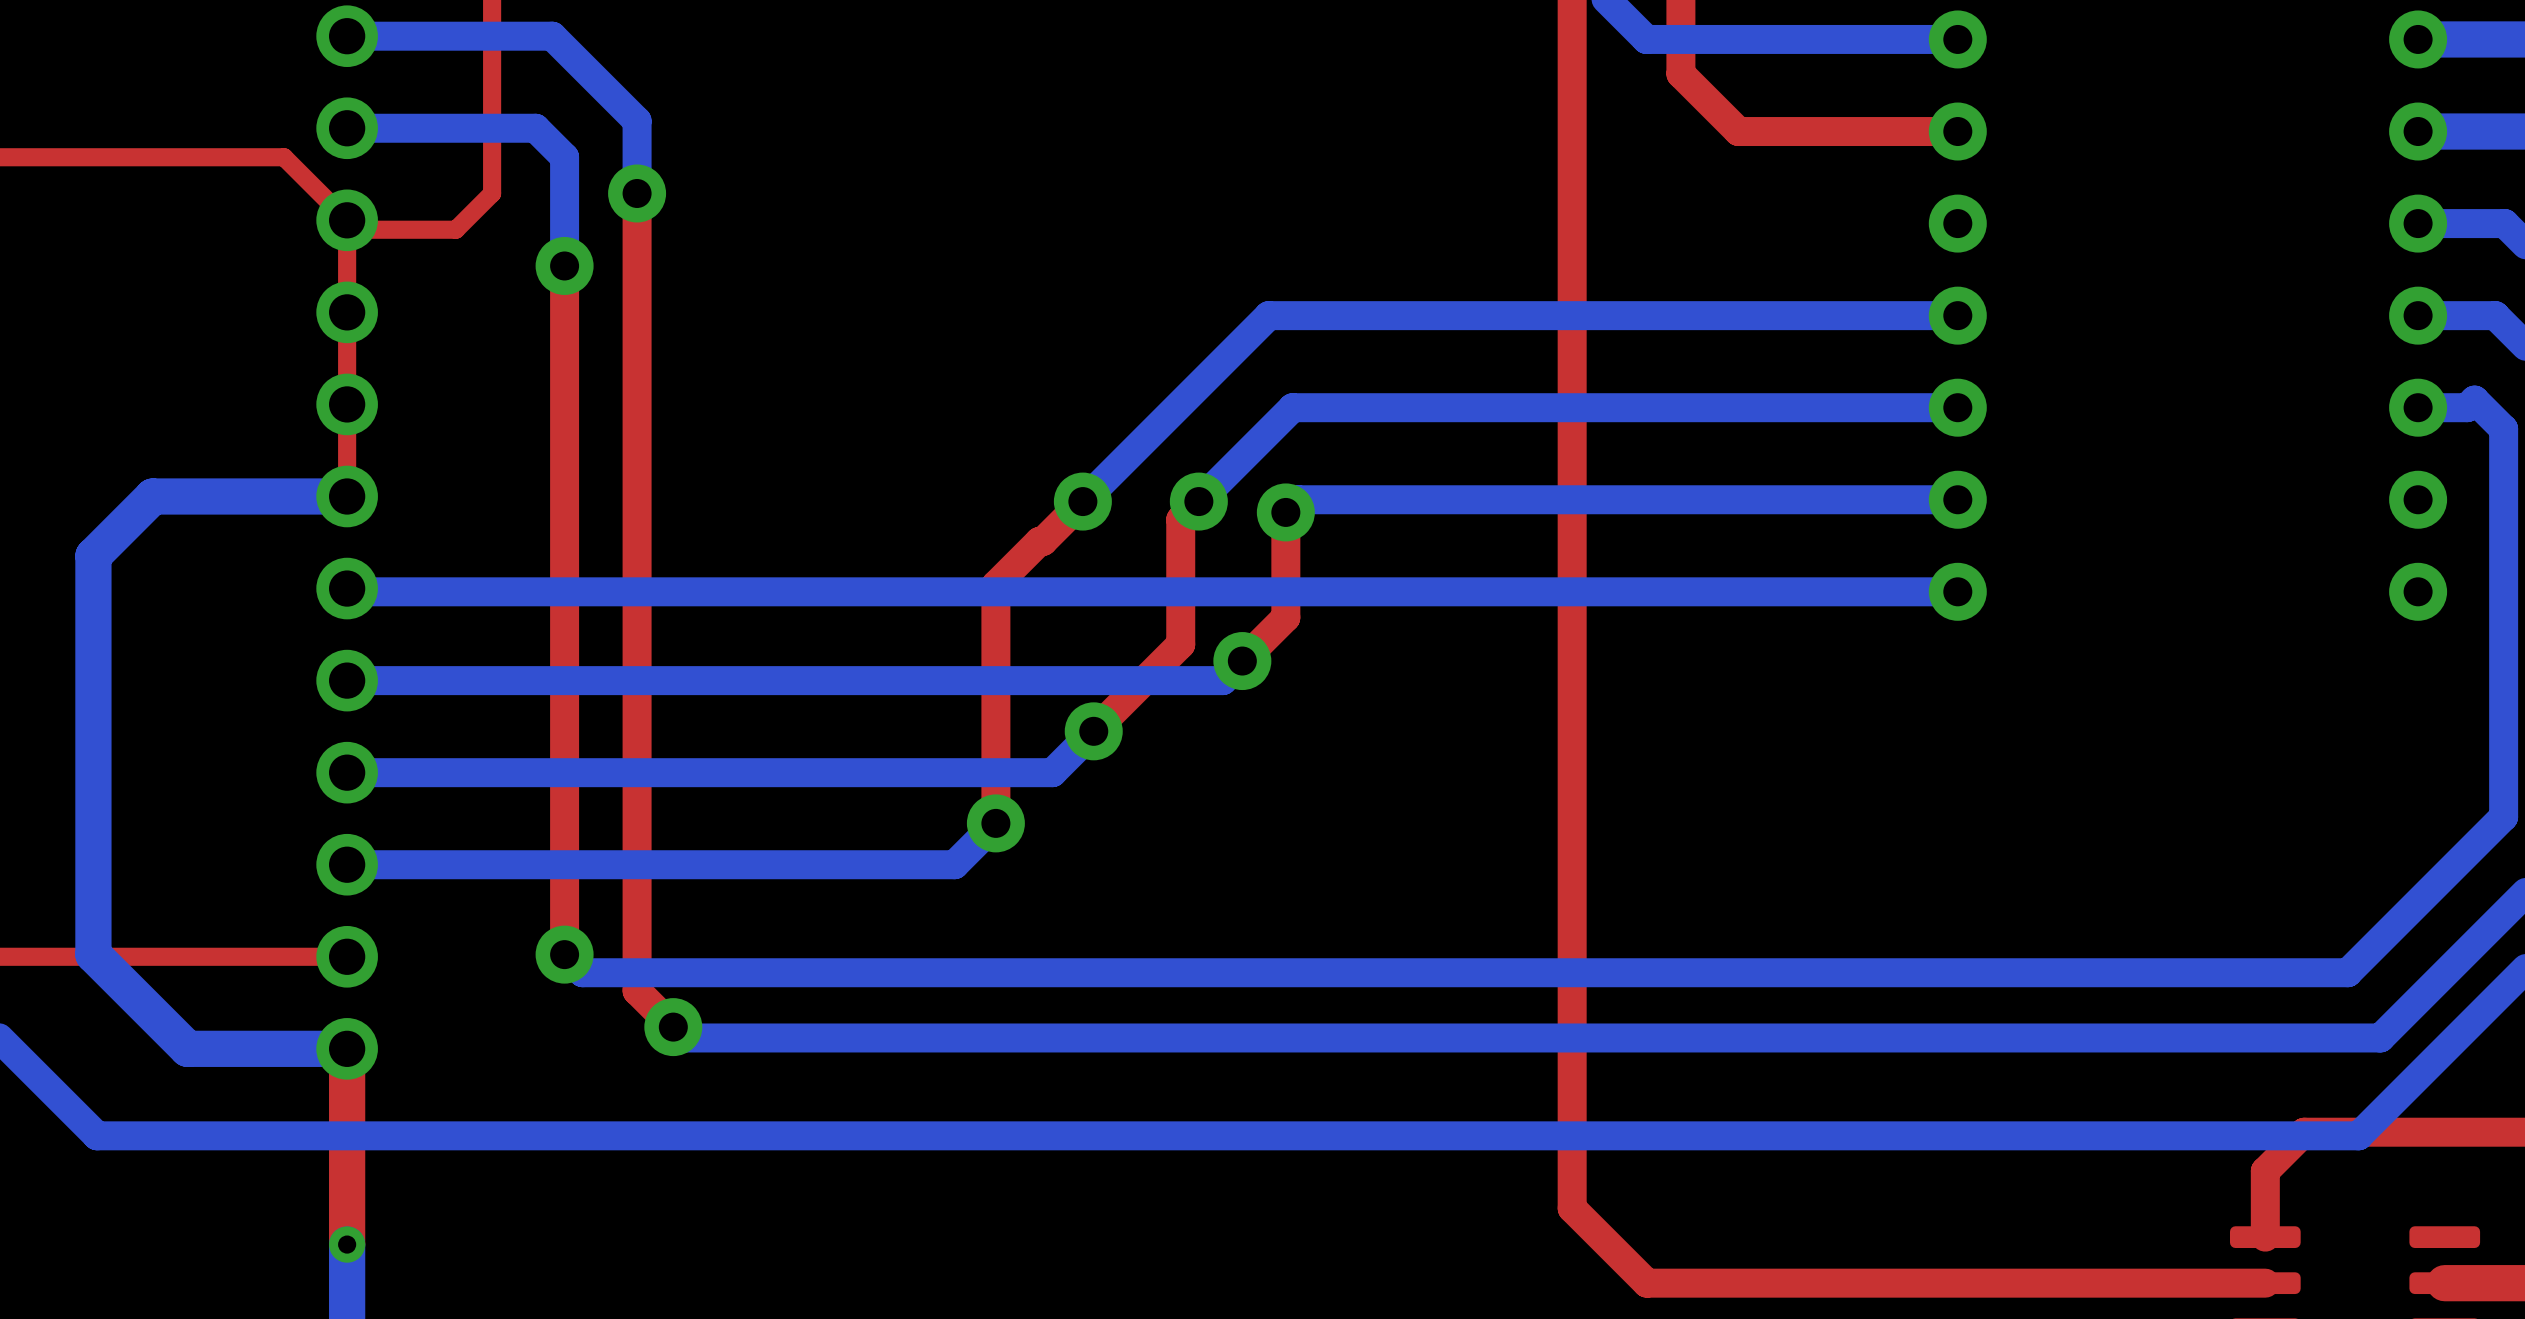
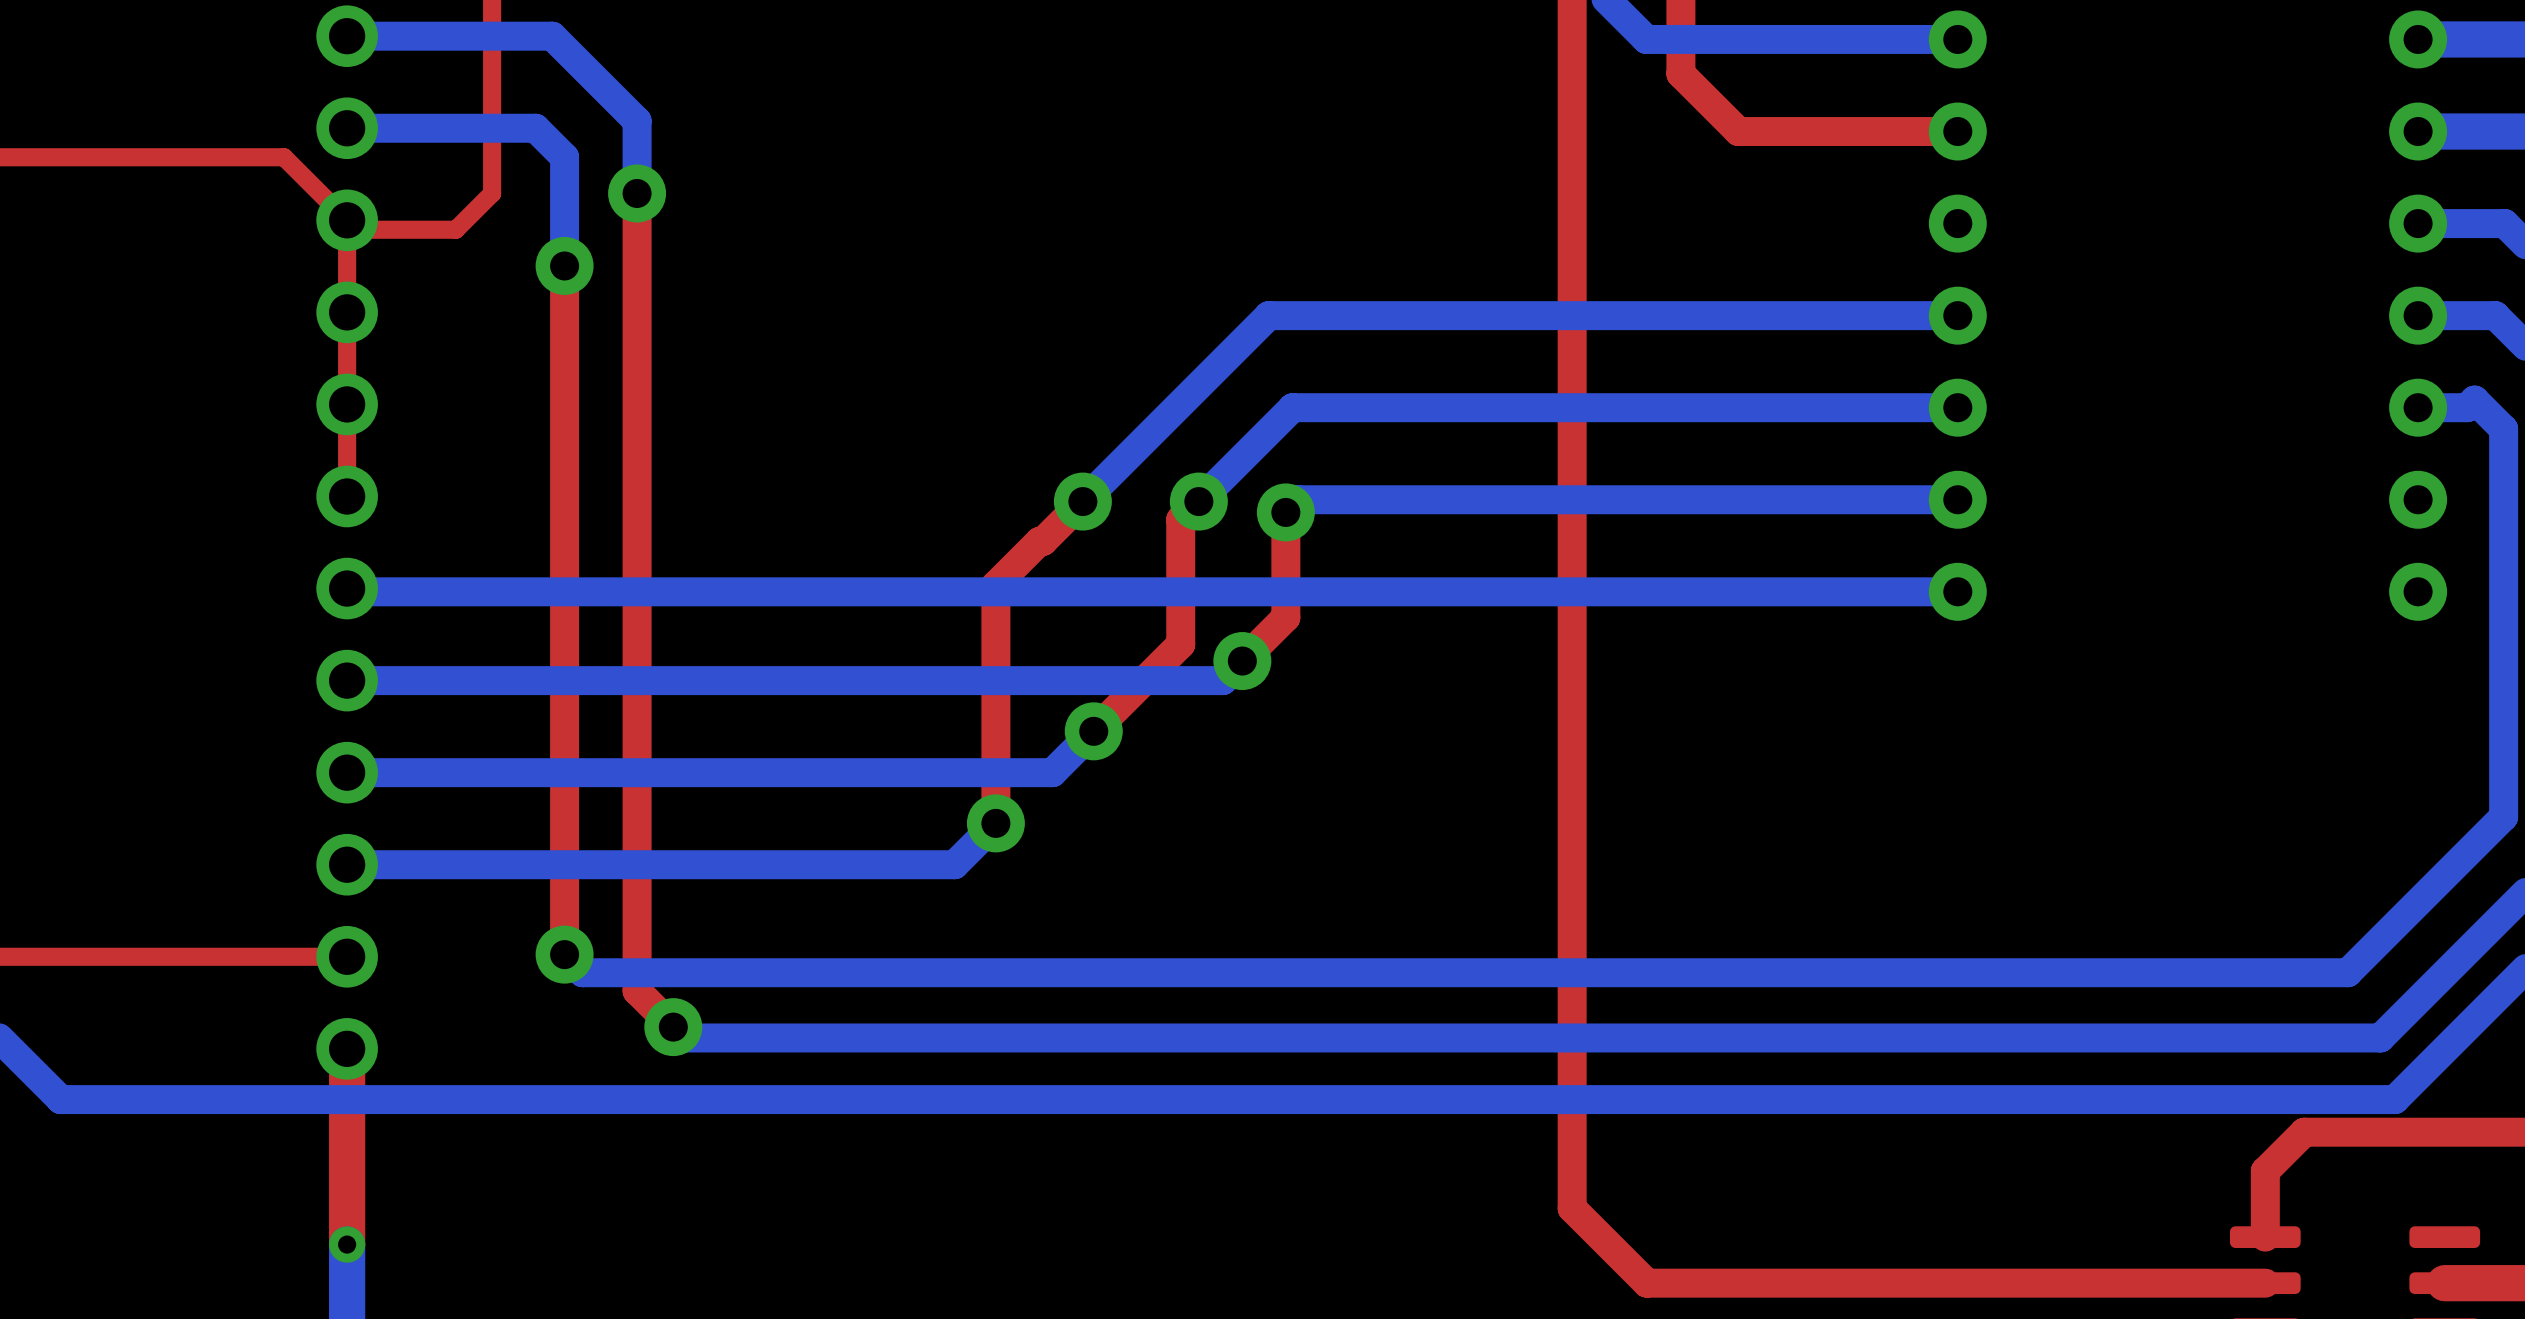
bottom track: (347, 496) (152, 496) (93, 555) (93, 954) (187, 1048) (347, 1048) -> none
bottom track: (2394, 1099) (2358, 1135) (97, 1135) (60, 1099) -> (2394, 1099) (60, 1099)

